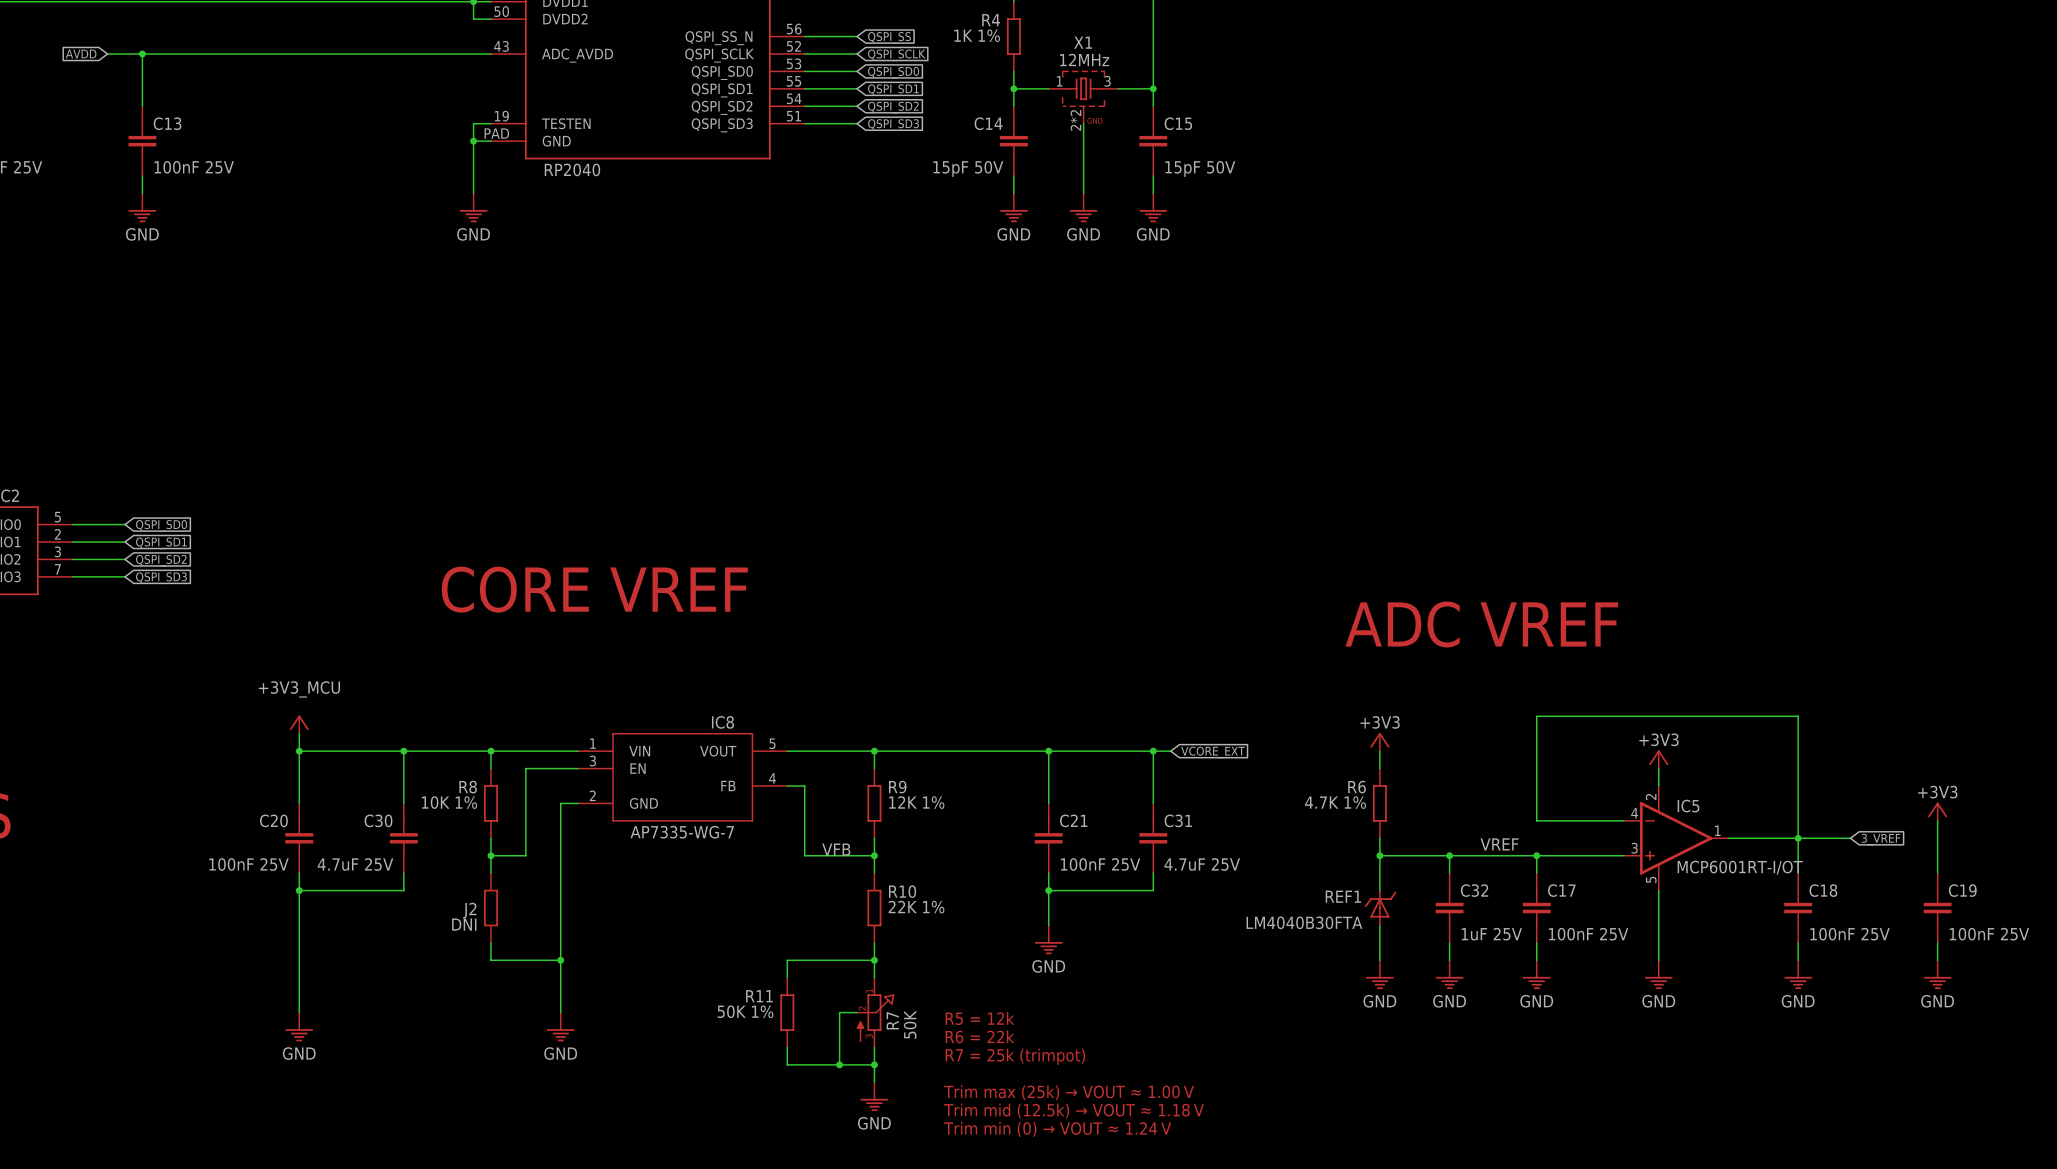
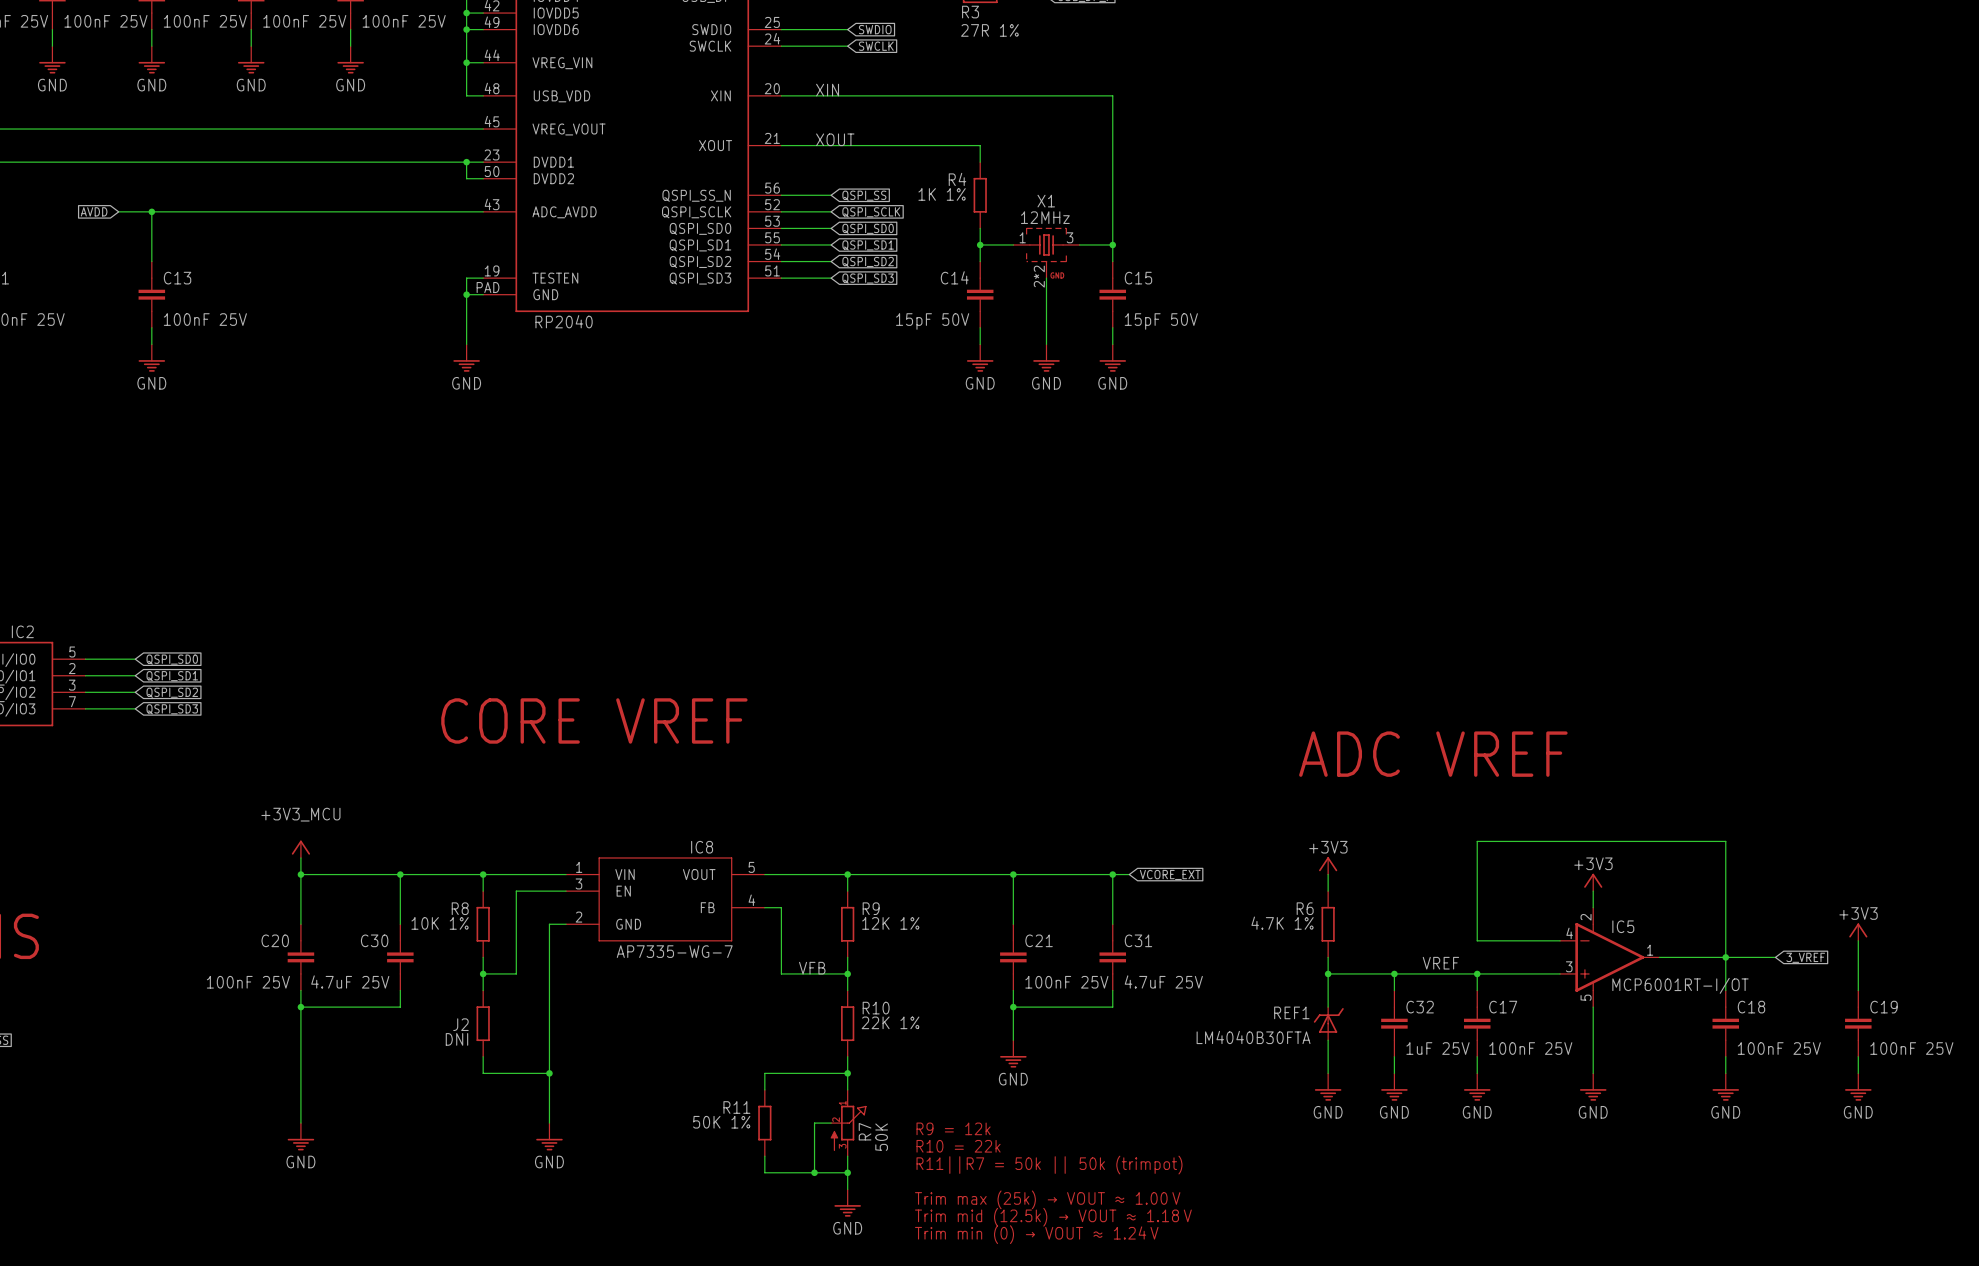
text: R5 = 12k (979, 1018) -> R9 = 12k (953, 1128)
text: R6 = 22k (979, 1036) -> R10 = 22k (958, 1146)
text: R7 = 25k (trimpot) (1015, 1056) -> R11||R7 = 50k || 50k (trimpot) (1049, 1165)

